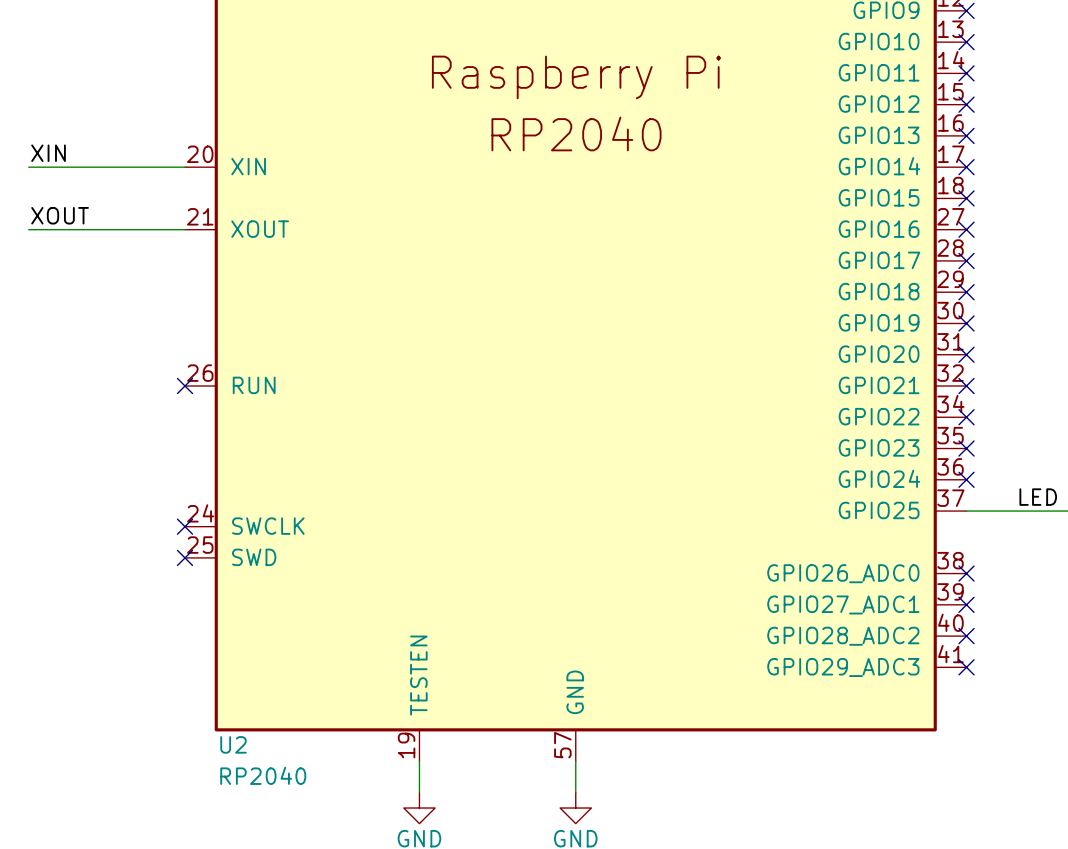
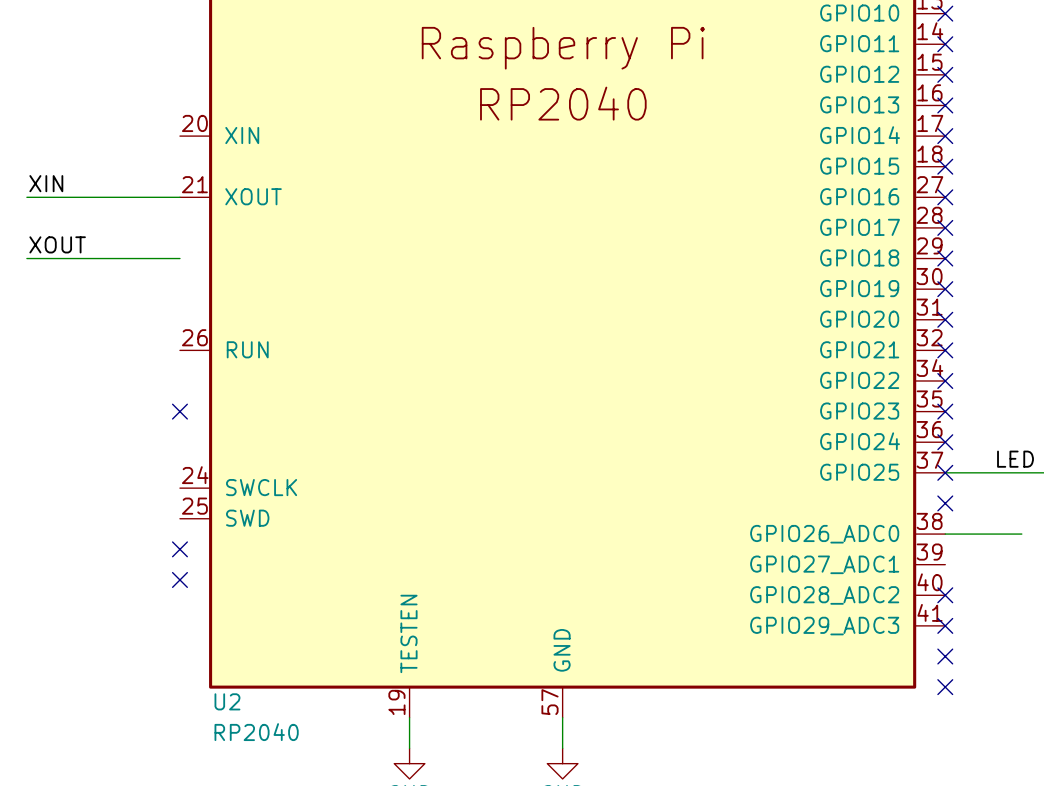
label: XIN (48, 153) -> none
wire: (28, 167) (185, 167) -> (26, 258) (179, 258)
label: XOUT (60, 215) -> XIN (46, 183)
label: none -> XOUT (57, 244)
no-connect mark: (185, 386) -> none
no-connect mark: none -> (179, 411)
no-connect mark: none -> (945, 472)
no-connect mark: (185, 526) -> none
no-connect mark: none -> (945, 503)
no-connect mark: (185, 557) -> none
wire: none -> (945, 534) (1021, 534)
no-connect mark: (966, 573) -> none
no-connect mark: none -> (179, 549)
no-connect mark: (966, 604) -> none
no-connect mark: none -> (179, 579)
no-connect mark: none -> (945, 656)
no-connect mark: none -> (945, 687)

